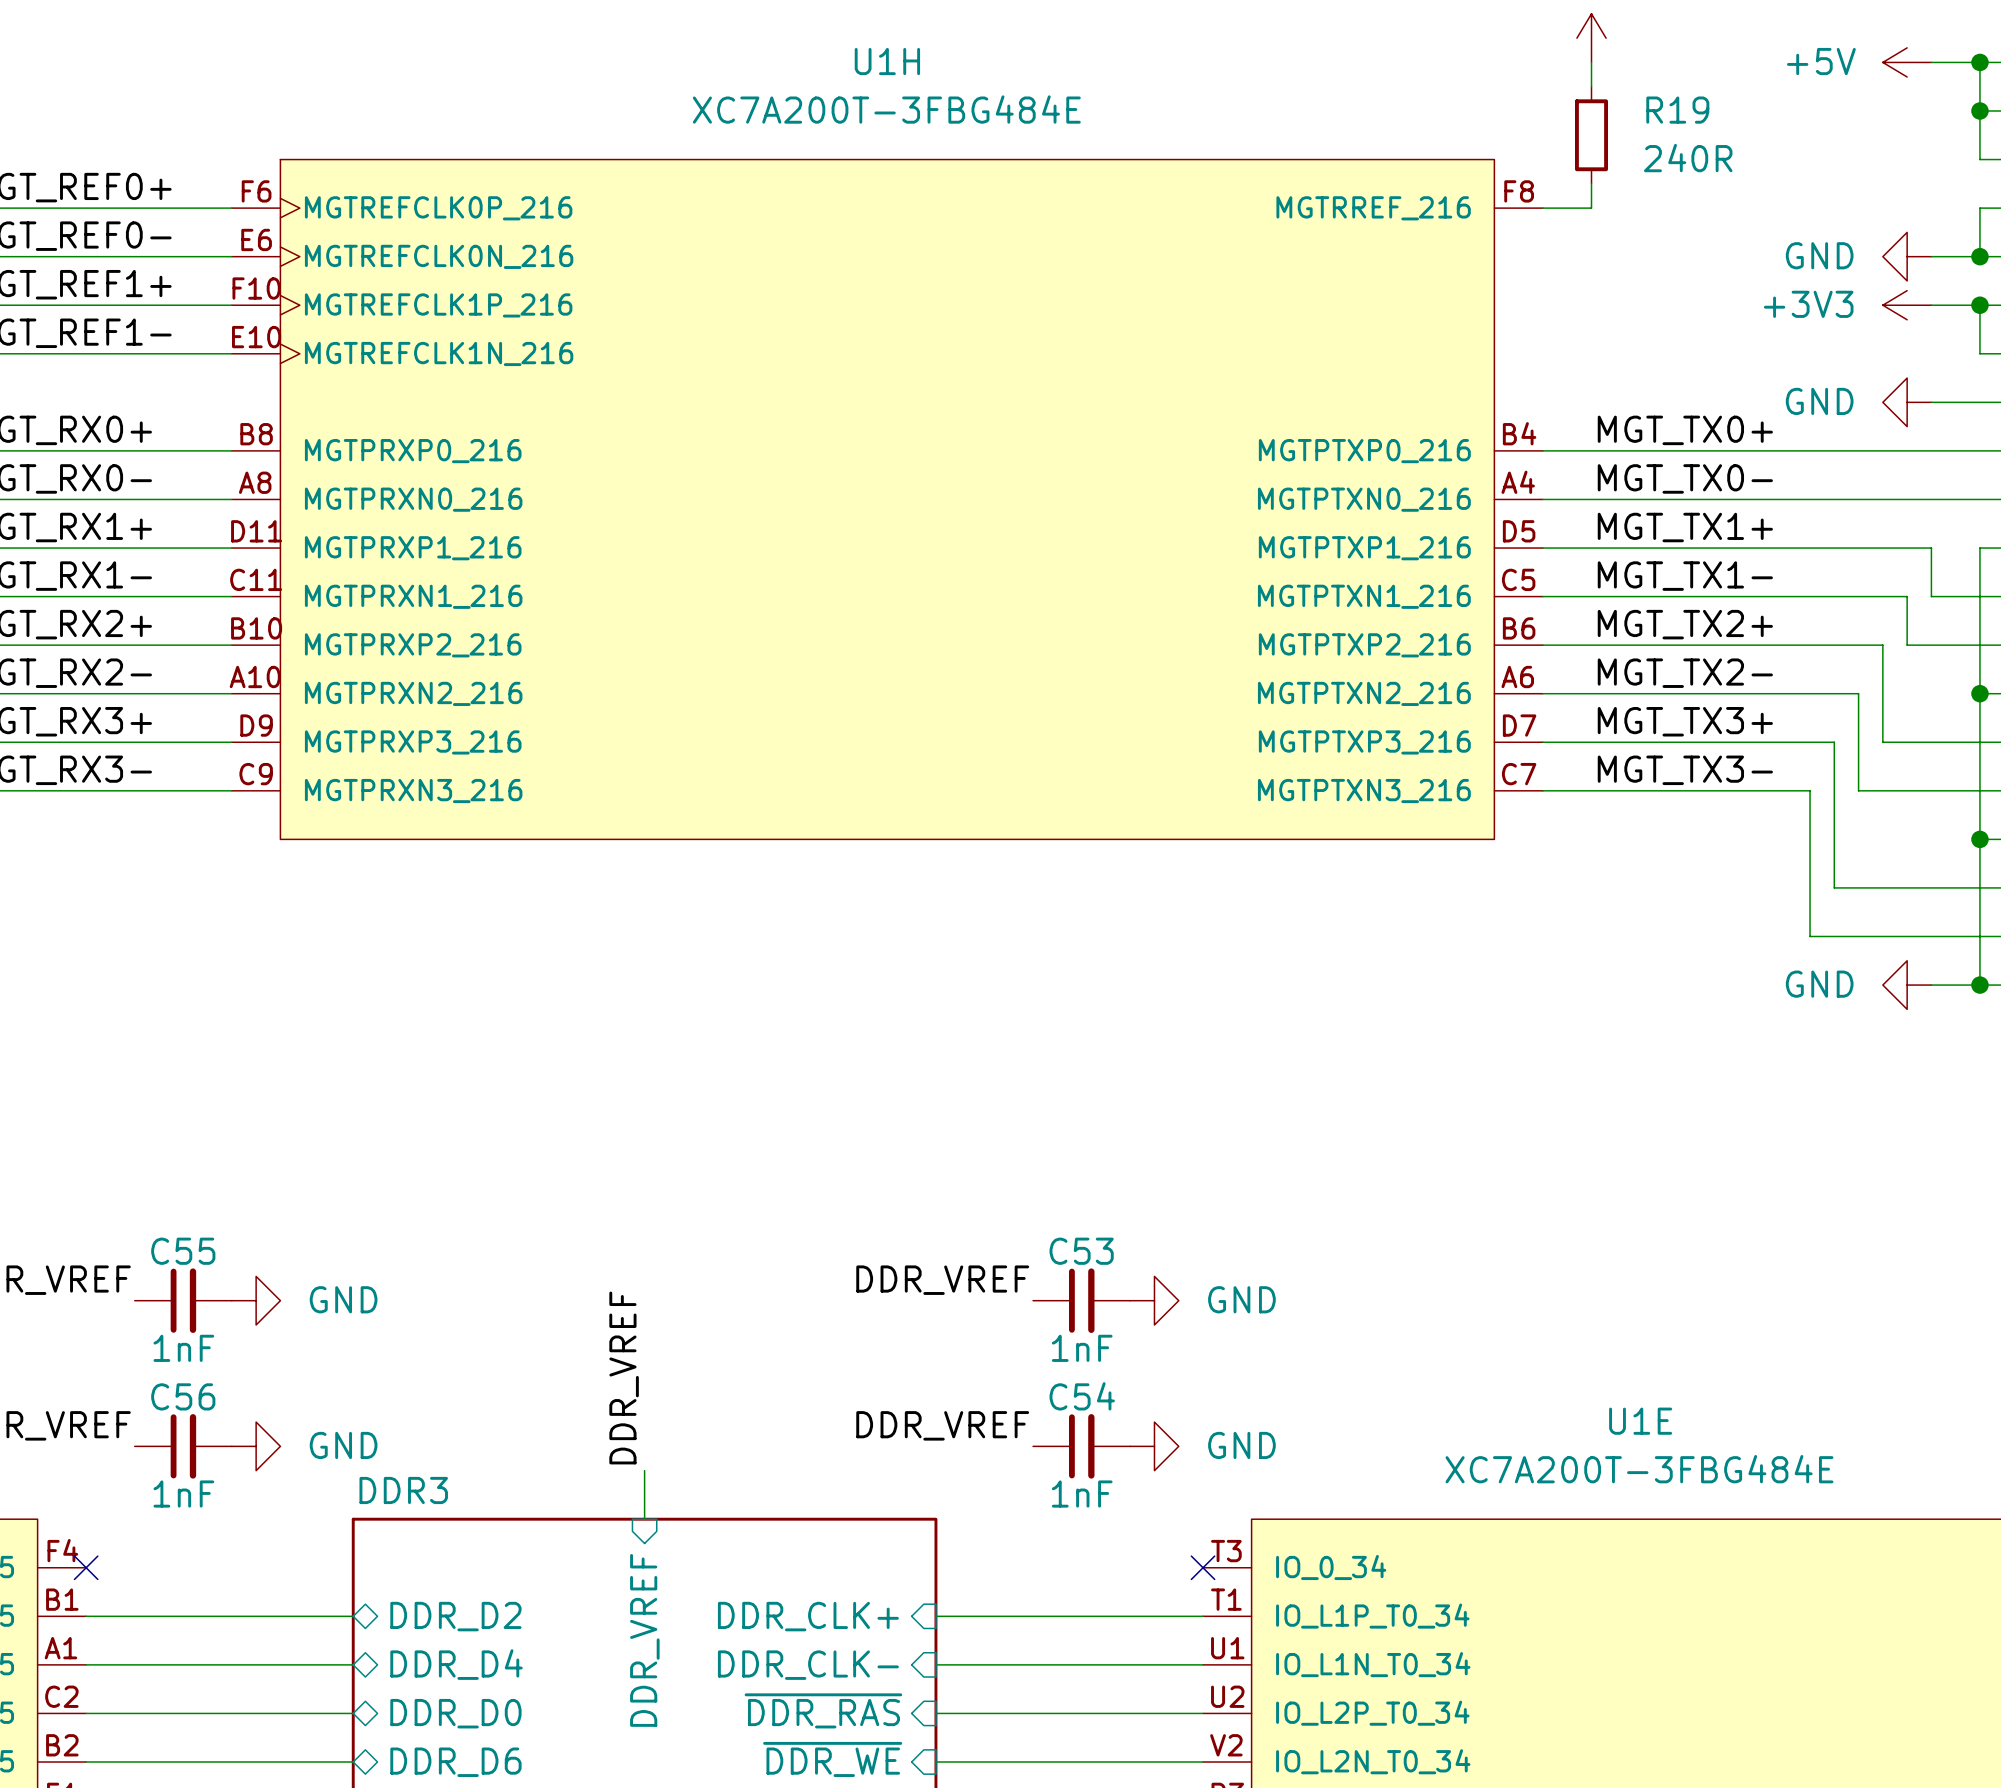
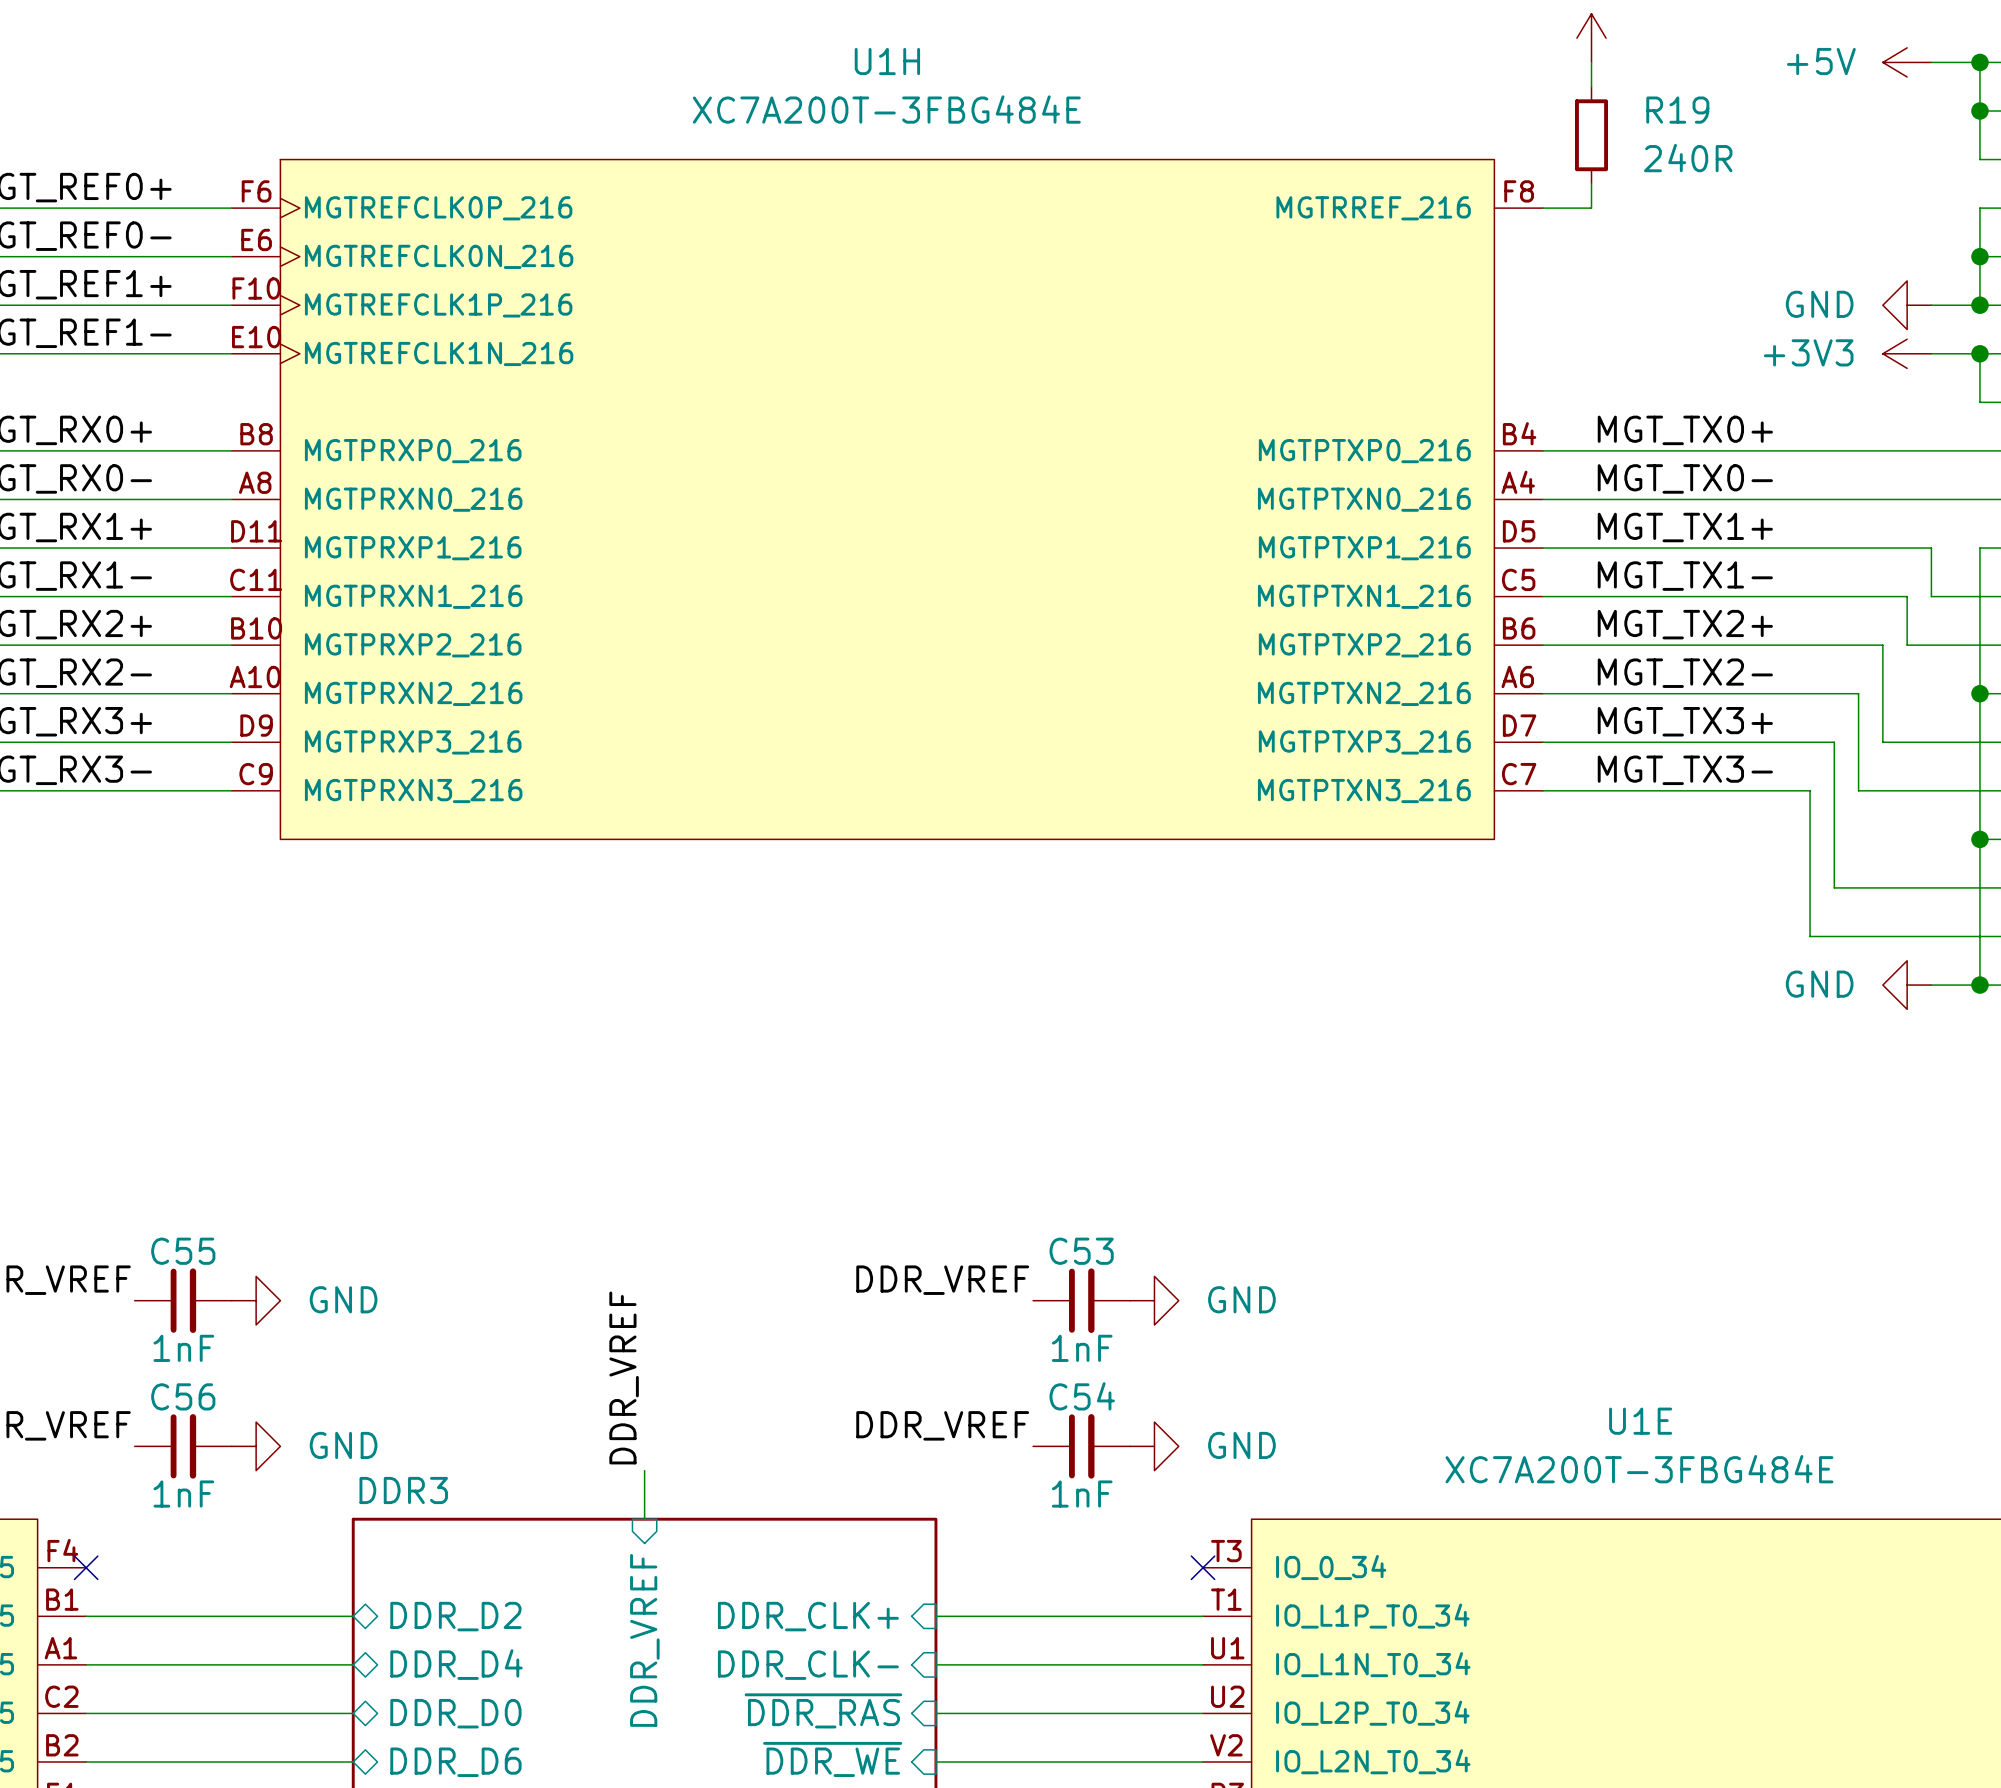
power symbol: GND (1907, 256) -> none
wire: (1931, 256) (1979, 256) -> (1979, 305) (1979, 256)
power symbol: +3V3 (1907, 305) -> GND (1907, 305)
wire: (1979, 305) (1979, 353) -> none
power symbol: none -> +3V3 (1907, 353)
junction: none -> (1979, 353)
power symbol: GND (1907, 402) -> none
wire: (1931, 402) (1979, 402) -> (1931, 353) (1979, 353) (1979, 402)

